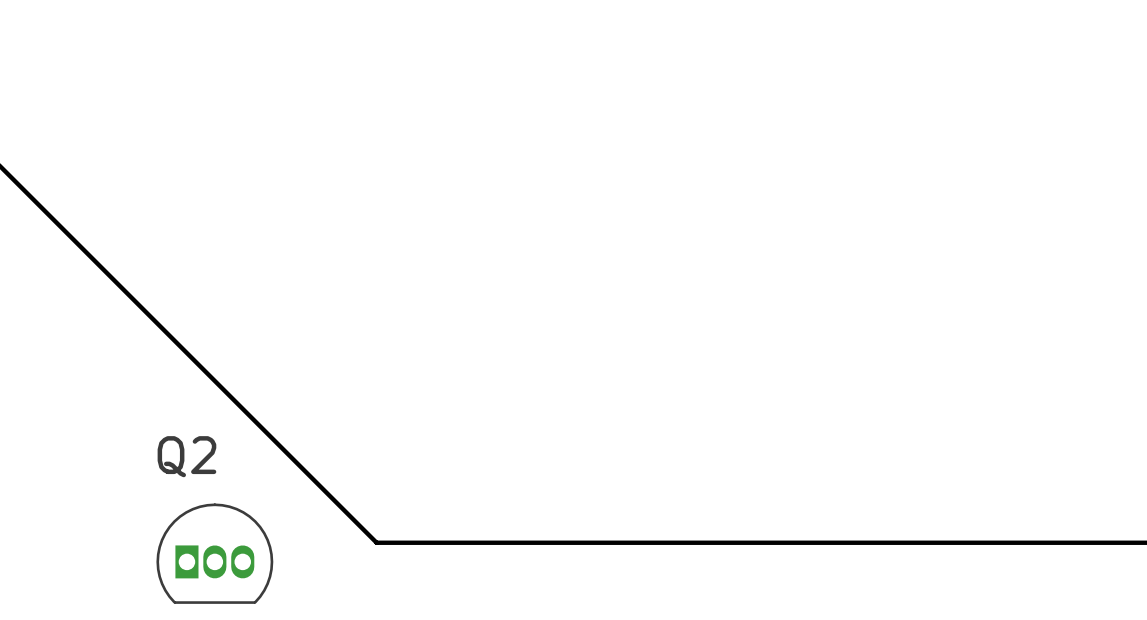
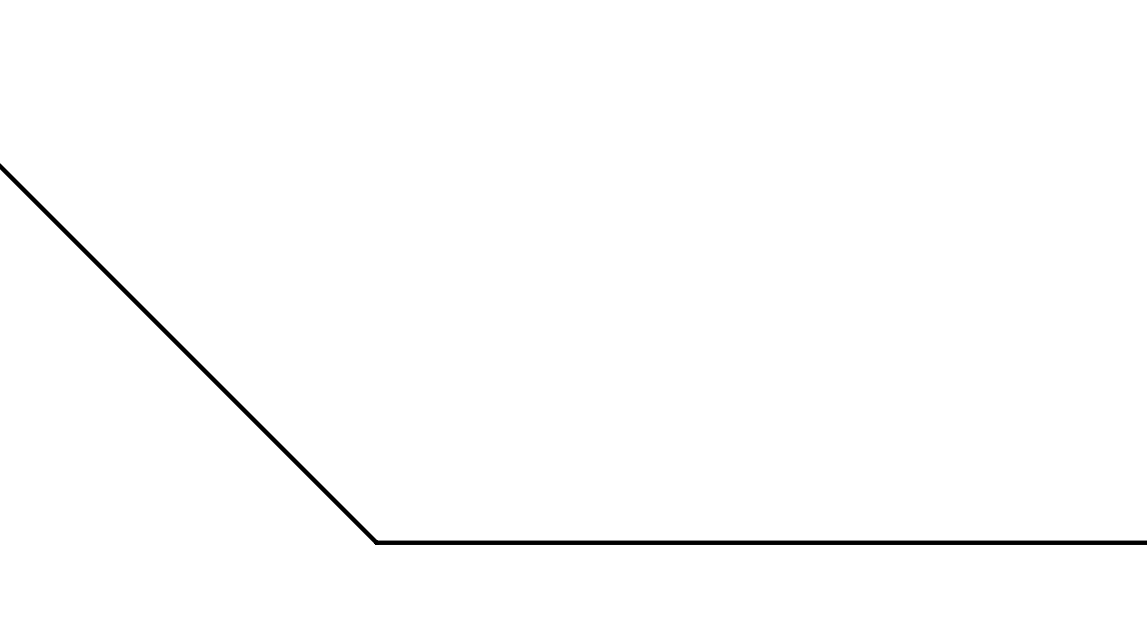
Q2: (214, 553) -> none

